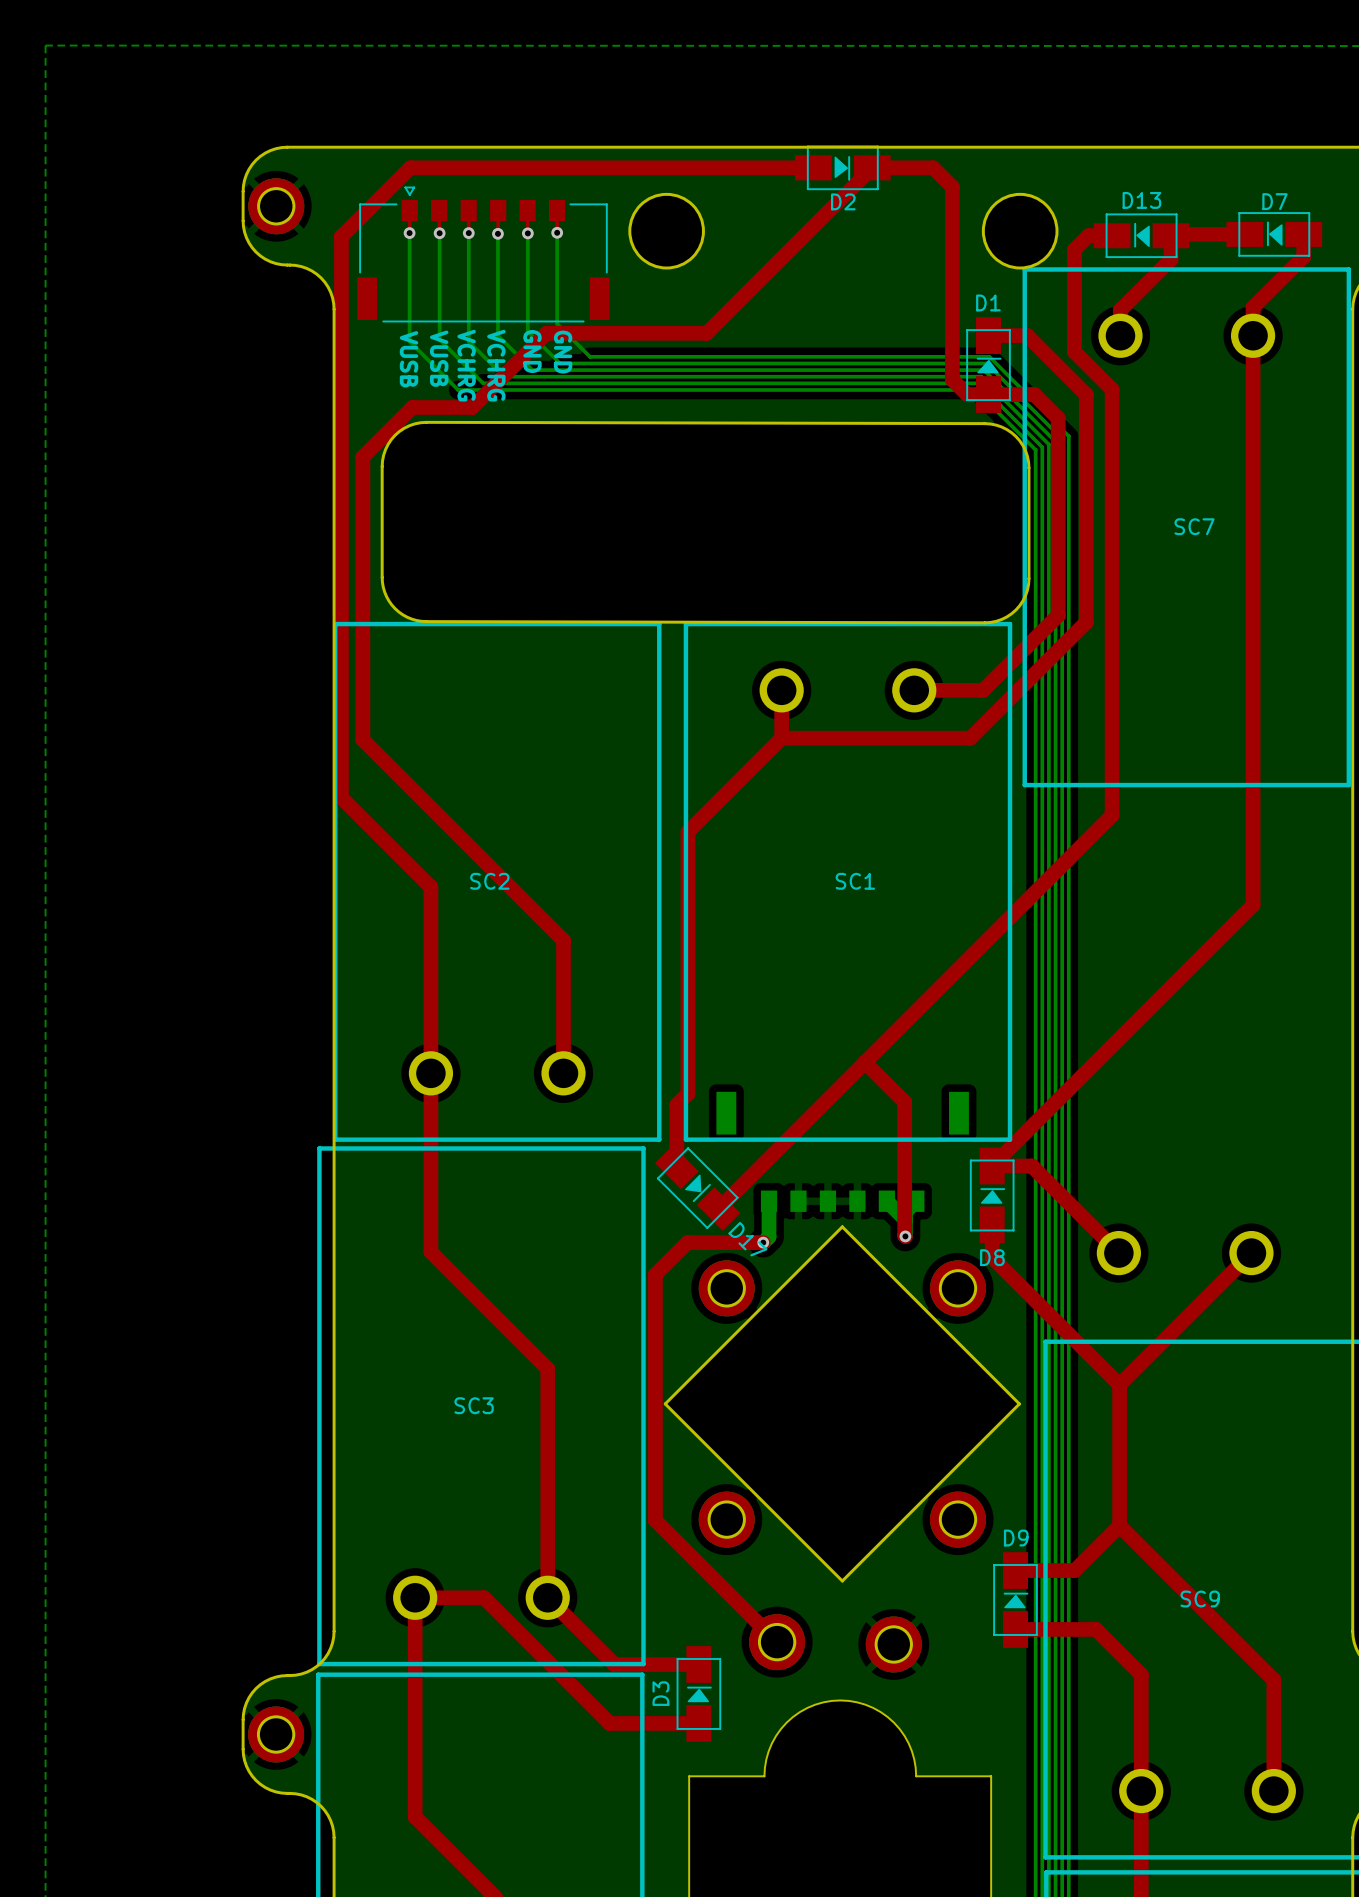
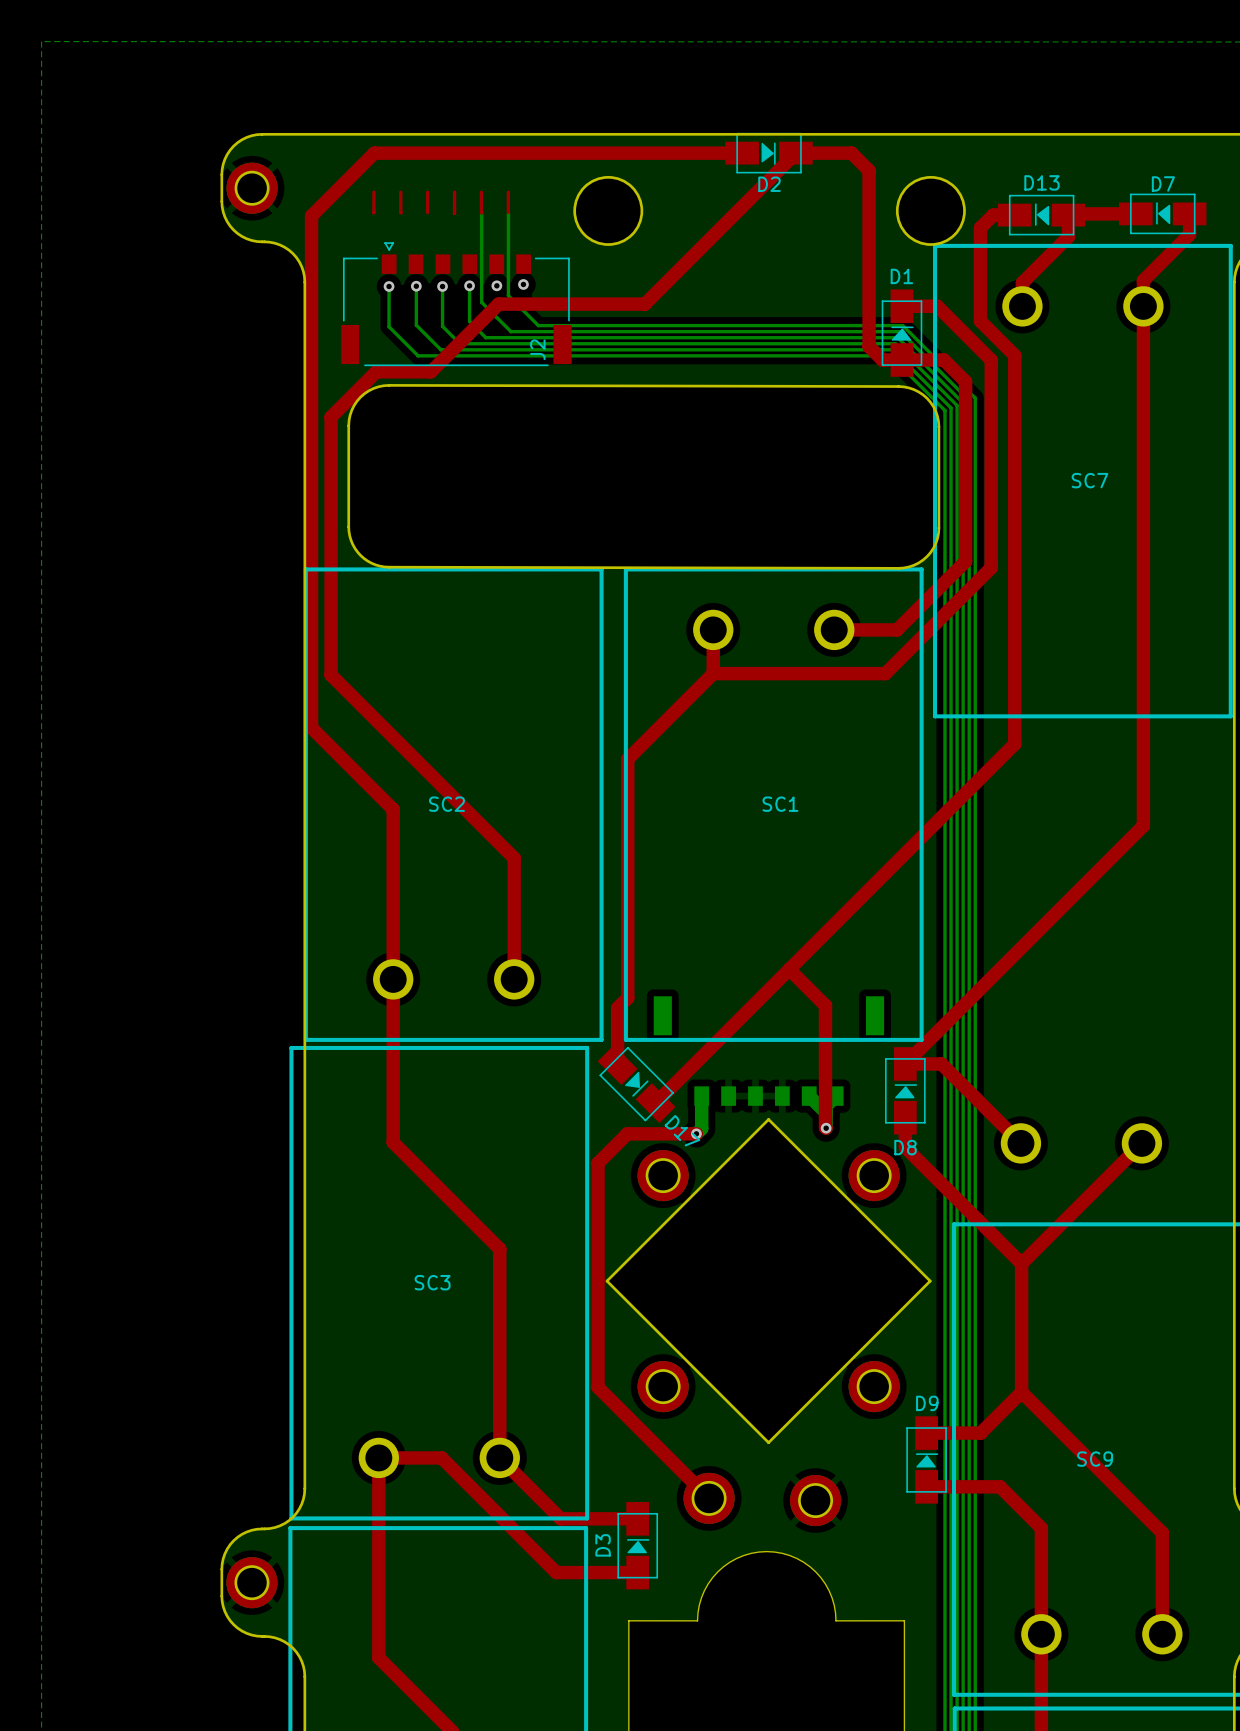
via: (557, 232) -> none
bottom track: (409, 233) (409, 341) (426, 358) -> (389, 286) (389, 326)
via: (409, 233) -> none
bottom track: (439, 233) (439, 339) (456, 356) -> (416, 286) (416, 325)
via: (439, 233) -> none
bottom track: (468, 233) (468, 341) (484, 357) -> (442, 286) (442, 326)
via: (468, 233) -> none
bottom track: (497, 233) (497, 335) (514, 352) -> (469, 285) (469, 321)
via: (497, 233) -> none
via: (527, 233) -> none
part: (483, 254) -> none
via: none -> (523, 284)
via: none -> (389, 286)
via: none -> (416, 286)
via: none -> (442, 286)
via: none -> (469, 285)
via: none -> (496, 285)
J2: none -> (456, 304)
text: GND (532, 351) -> none
text: GND (563, 352) -> none
text: VUSB (439, 358) -> none
text: VUSB (409, 359) -> none
text: VCHRG (466, 365) -> none
text: VCHRG (496, 365) -> none

